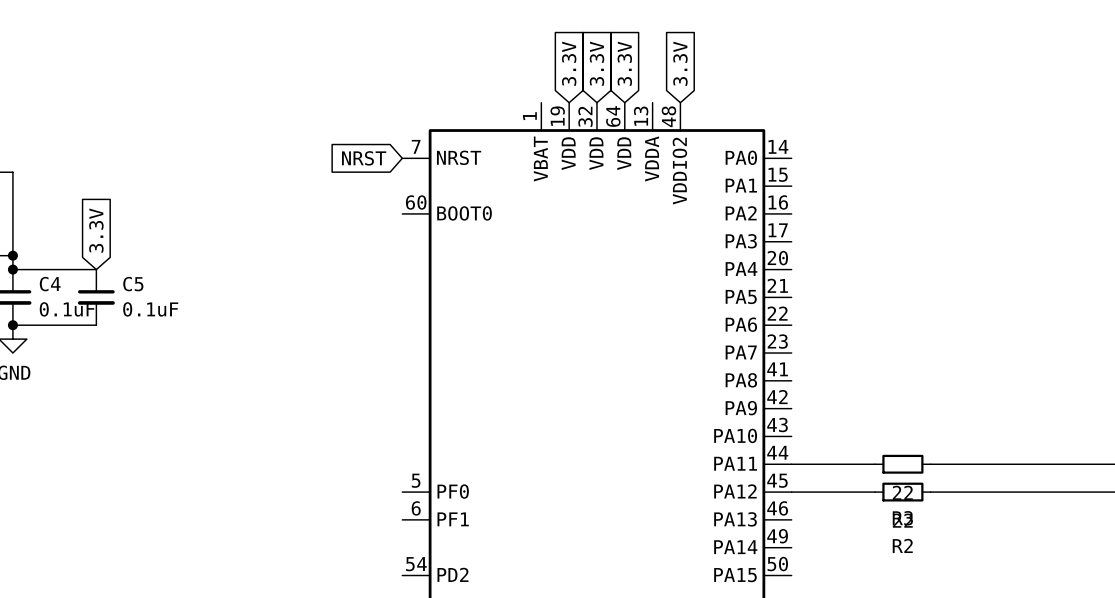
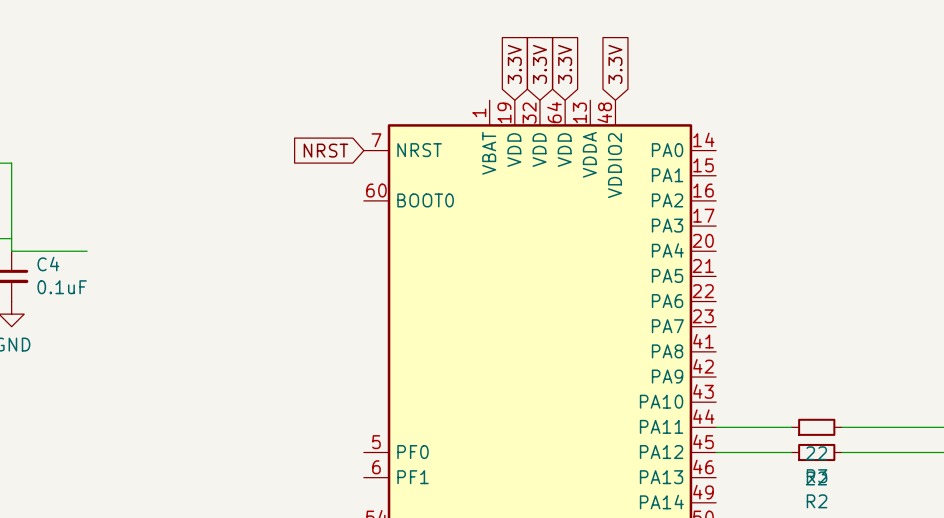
global label: 3.3V (96, 230) -> none
junction: (12, 255) -> none
junction: (12, 269) -> none
C5: 0.1uF (96, 297) -> none
wire: (12, 325) (96, 325) -> none
junction: (12, 325) -> none

